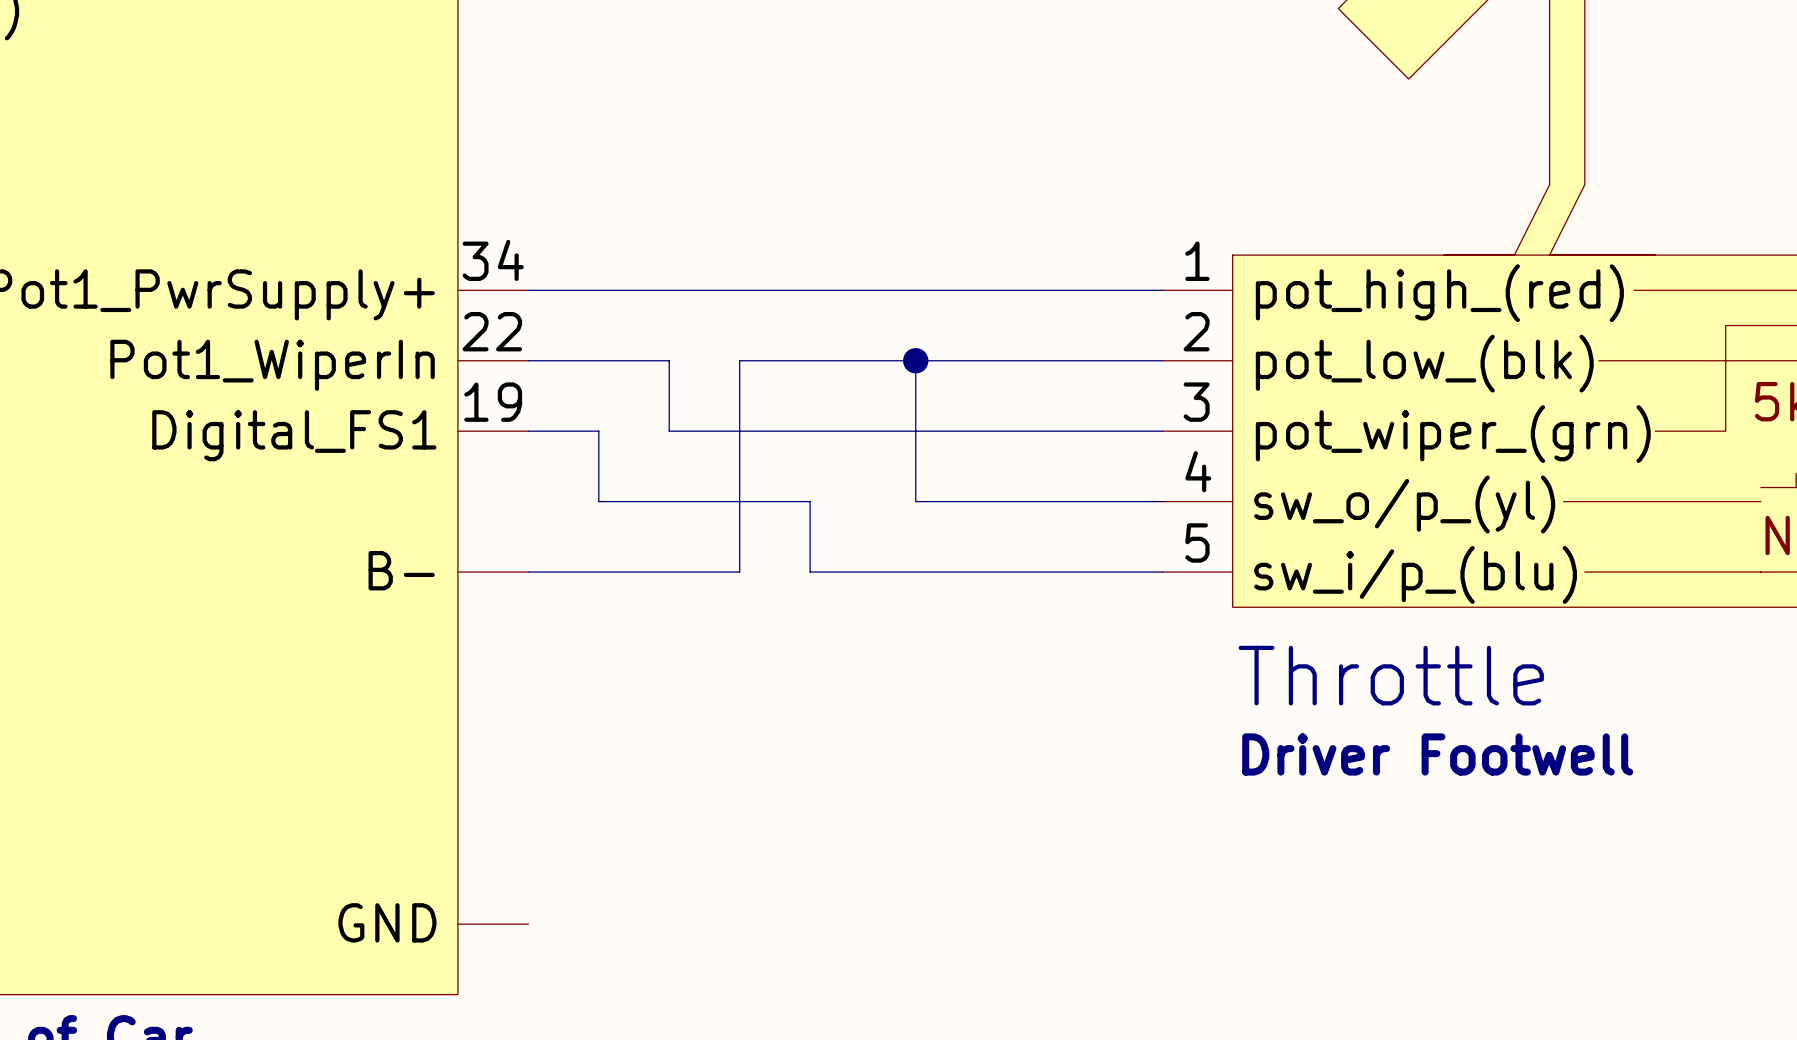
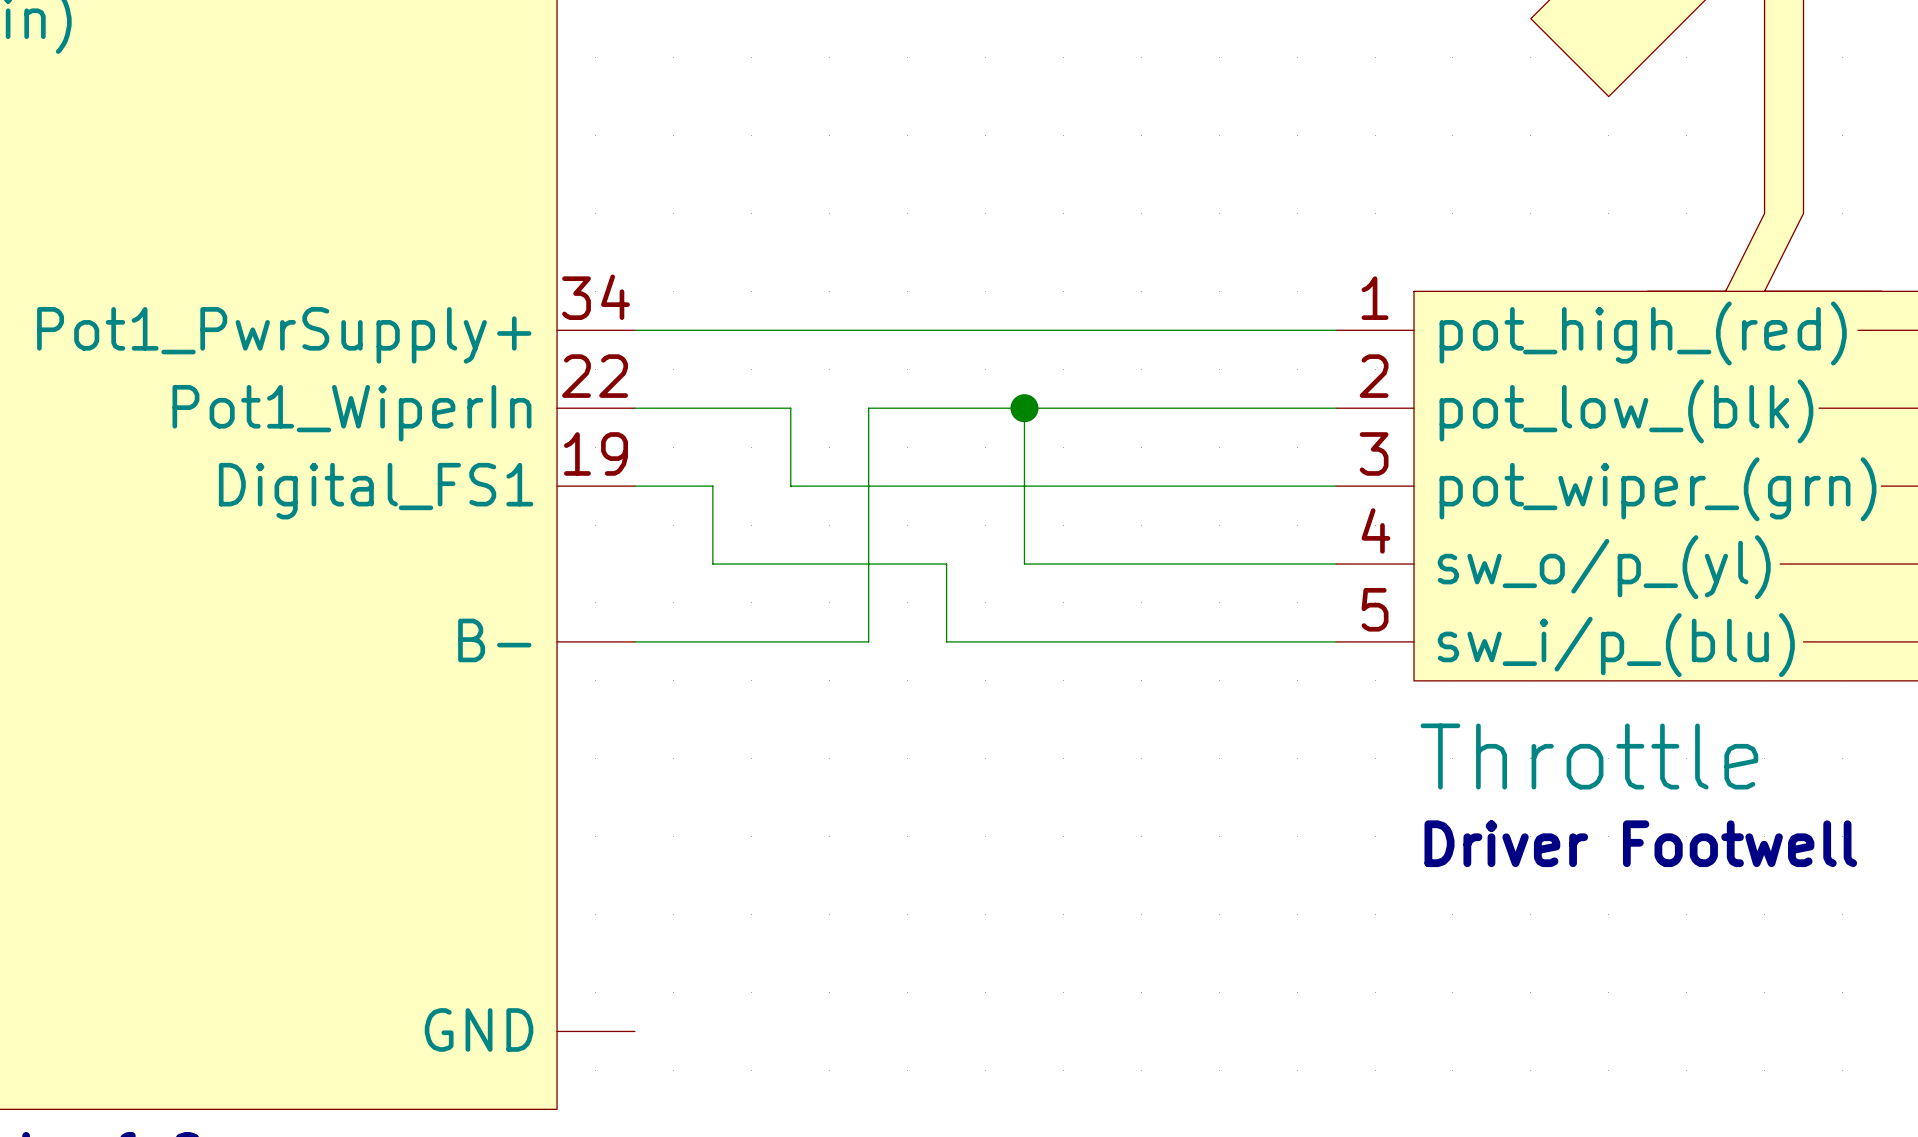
wire: (915, 360) (915, 501) -> (1024, 408) (1024, 564) (1063, 564)
junction position: (915, 360) -> (1024, 408)

